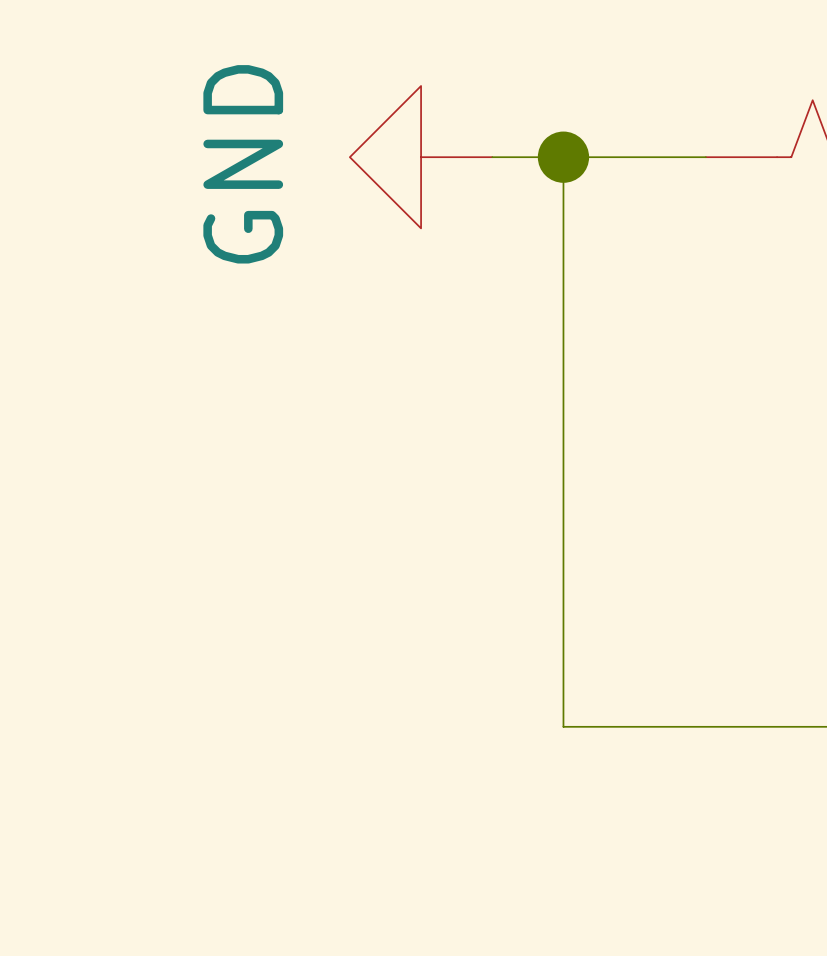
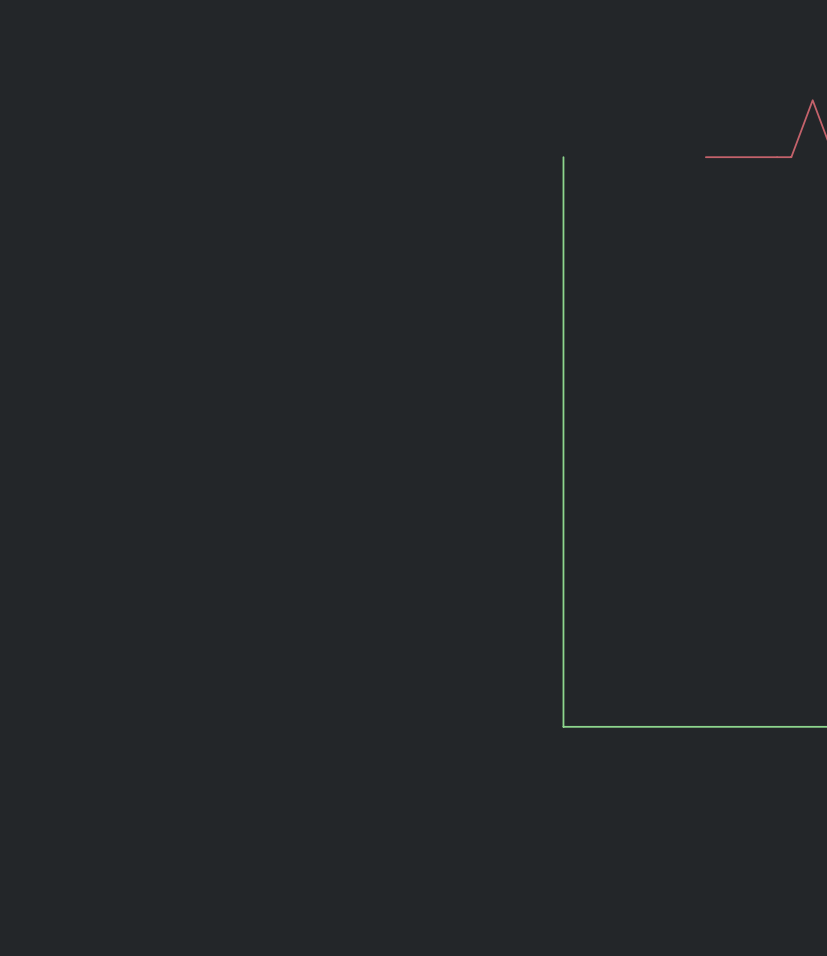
power symbol: GND (421, 157) -> none
wire: (492, 157) (705, 157) -> none
junction: (563, 157) -> none

